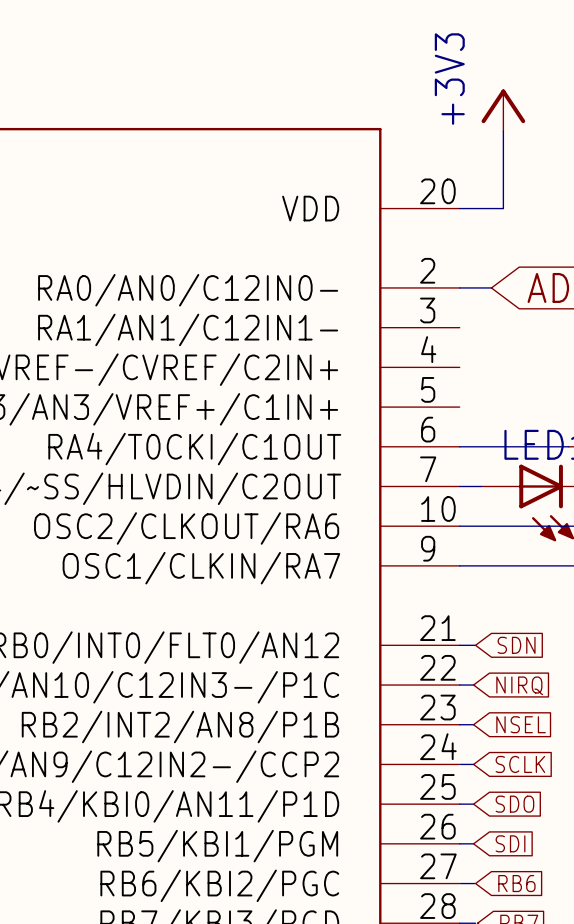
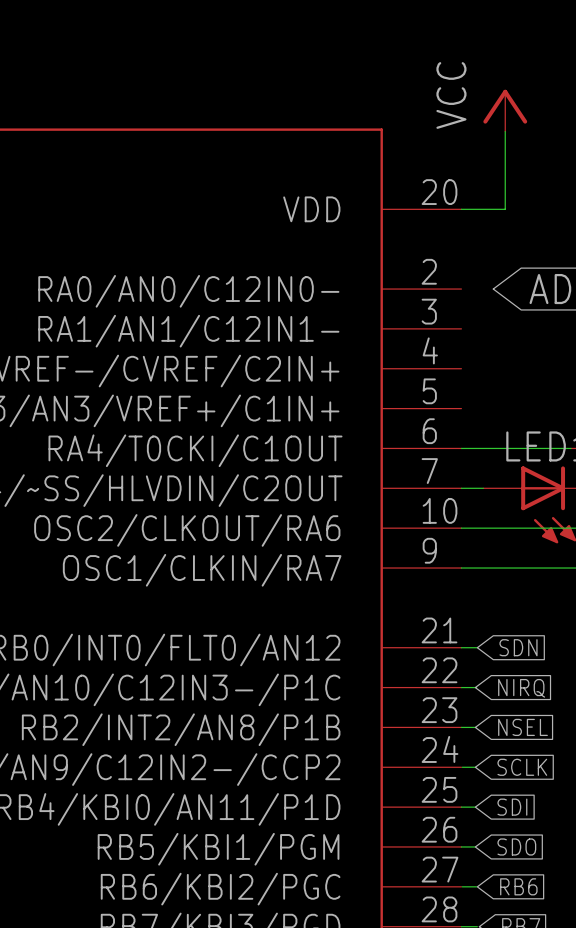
power symbol: +3V3 (503, 110) -> VCC (505, 110)
wire: (459, 287) (491, 287) -> none
global label: SDO (514, 804) -> SDI (512, 807)
global label: SDI (510, 843) -> SDO (516, 846)

